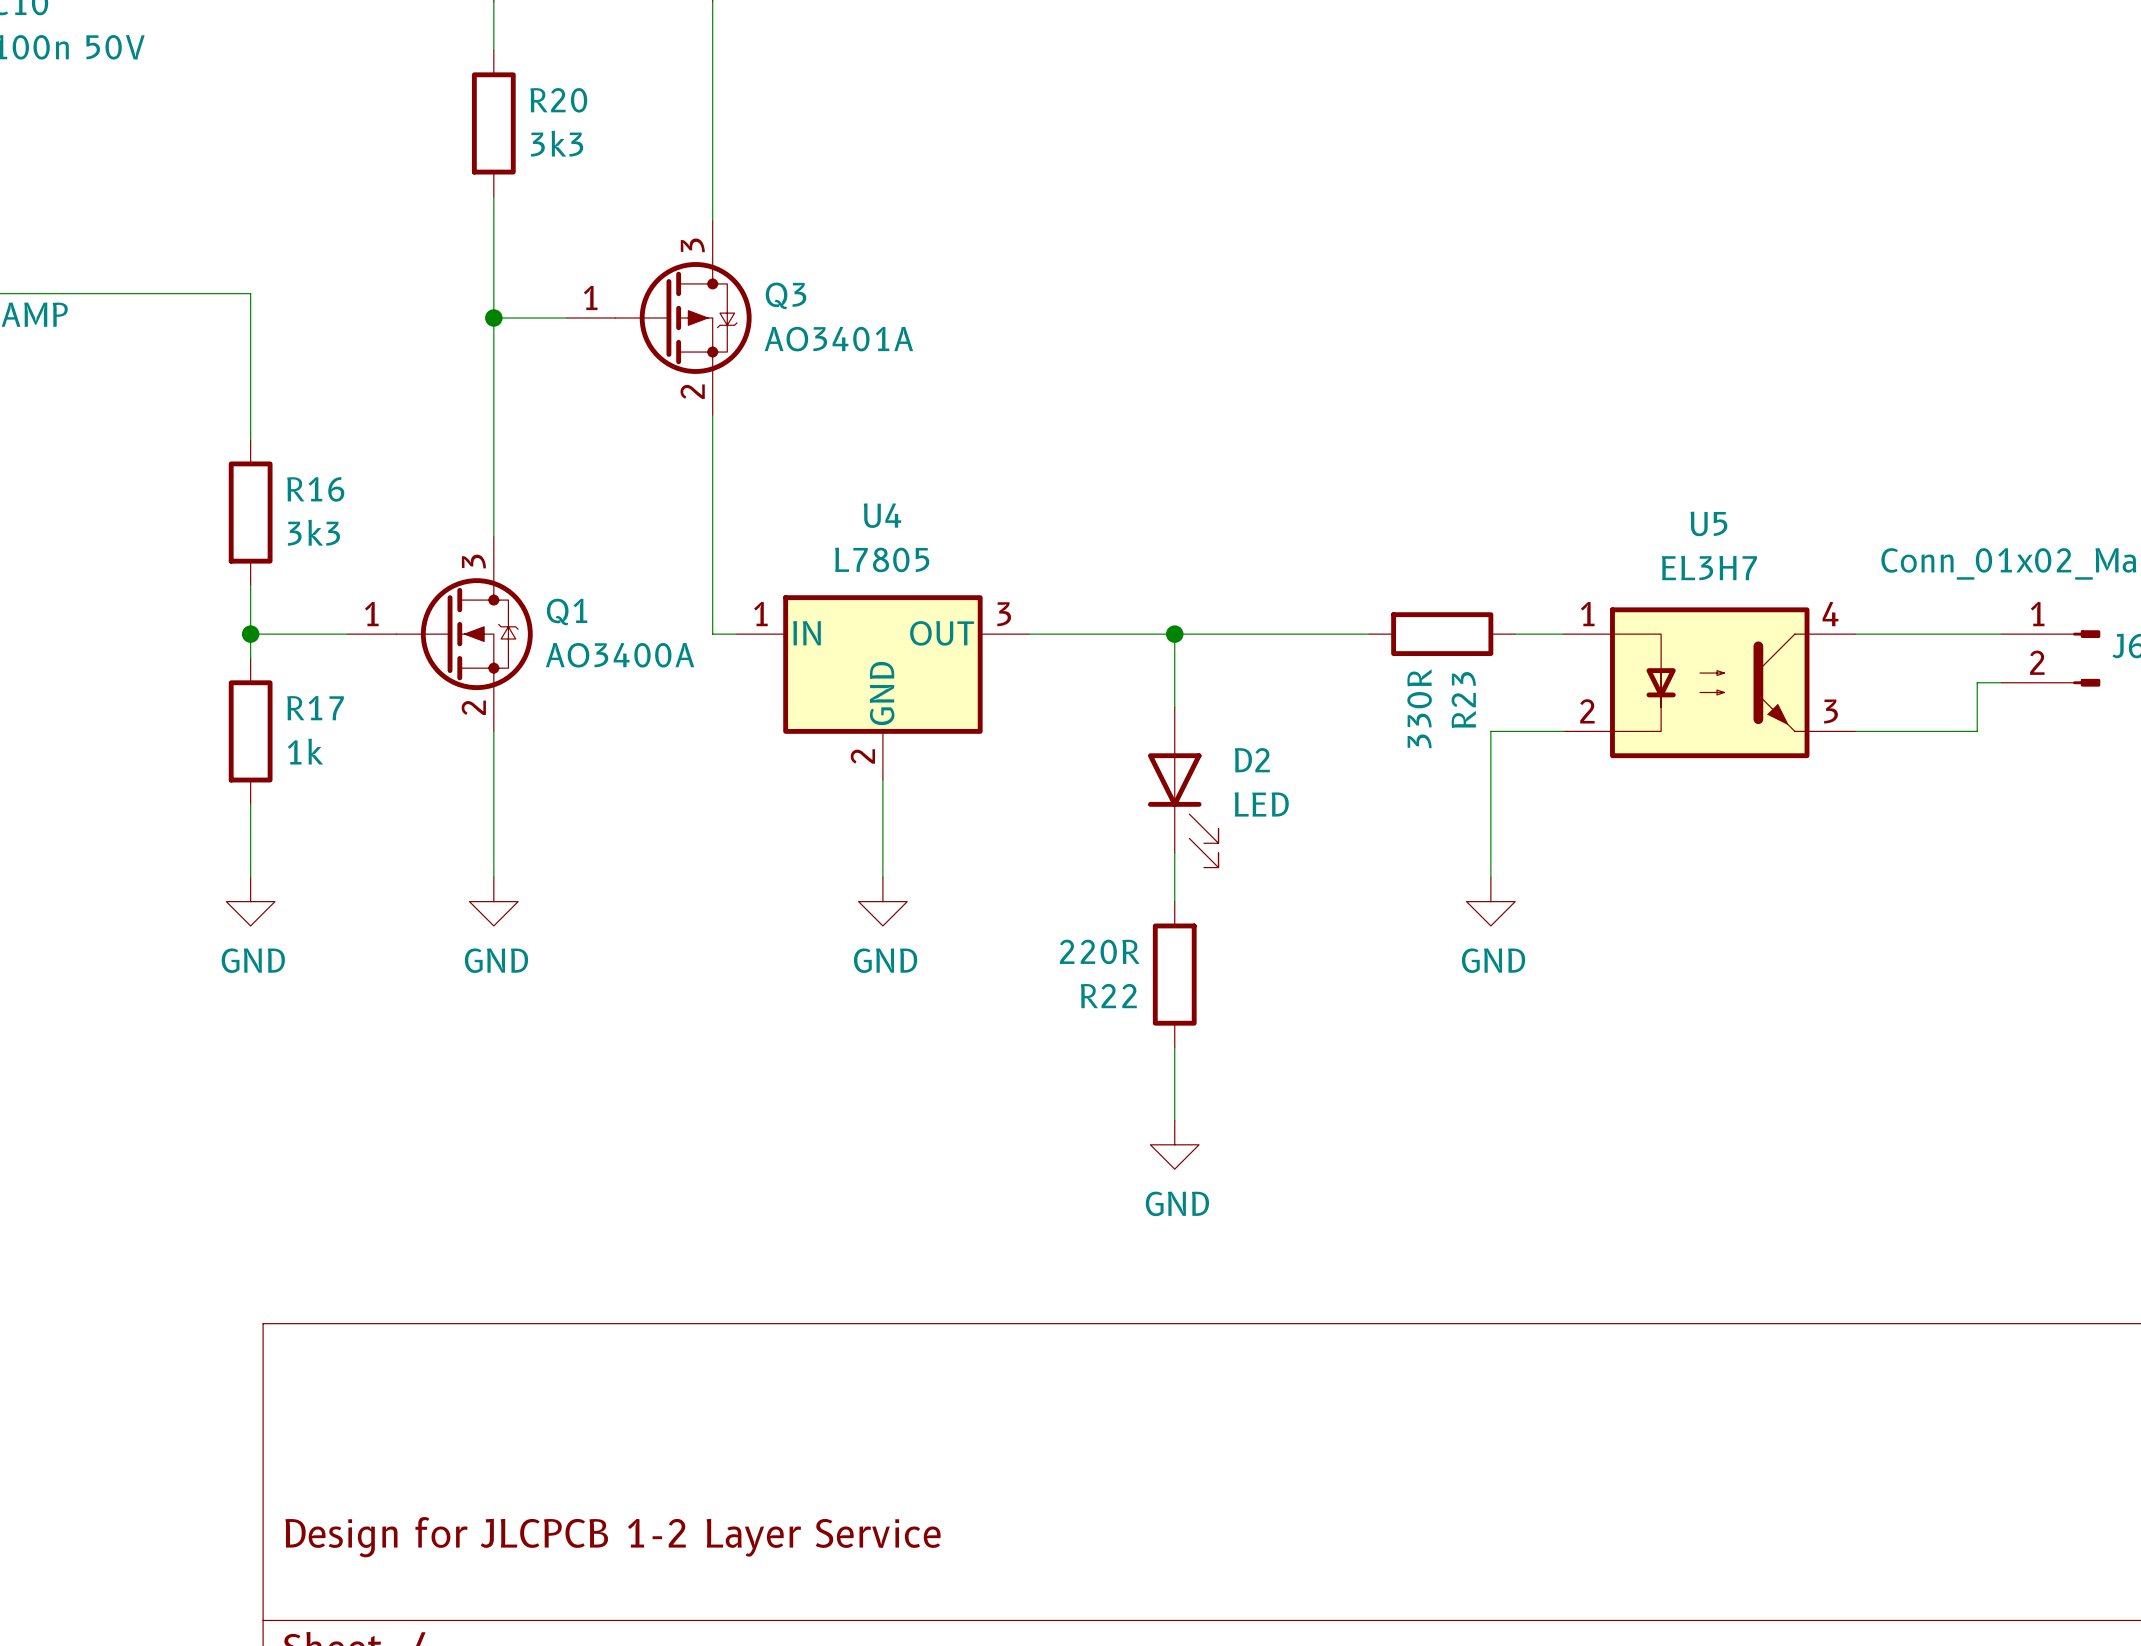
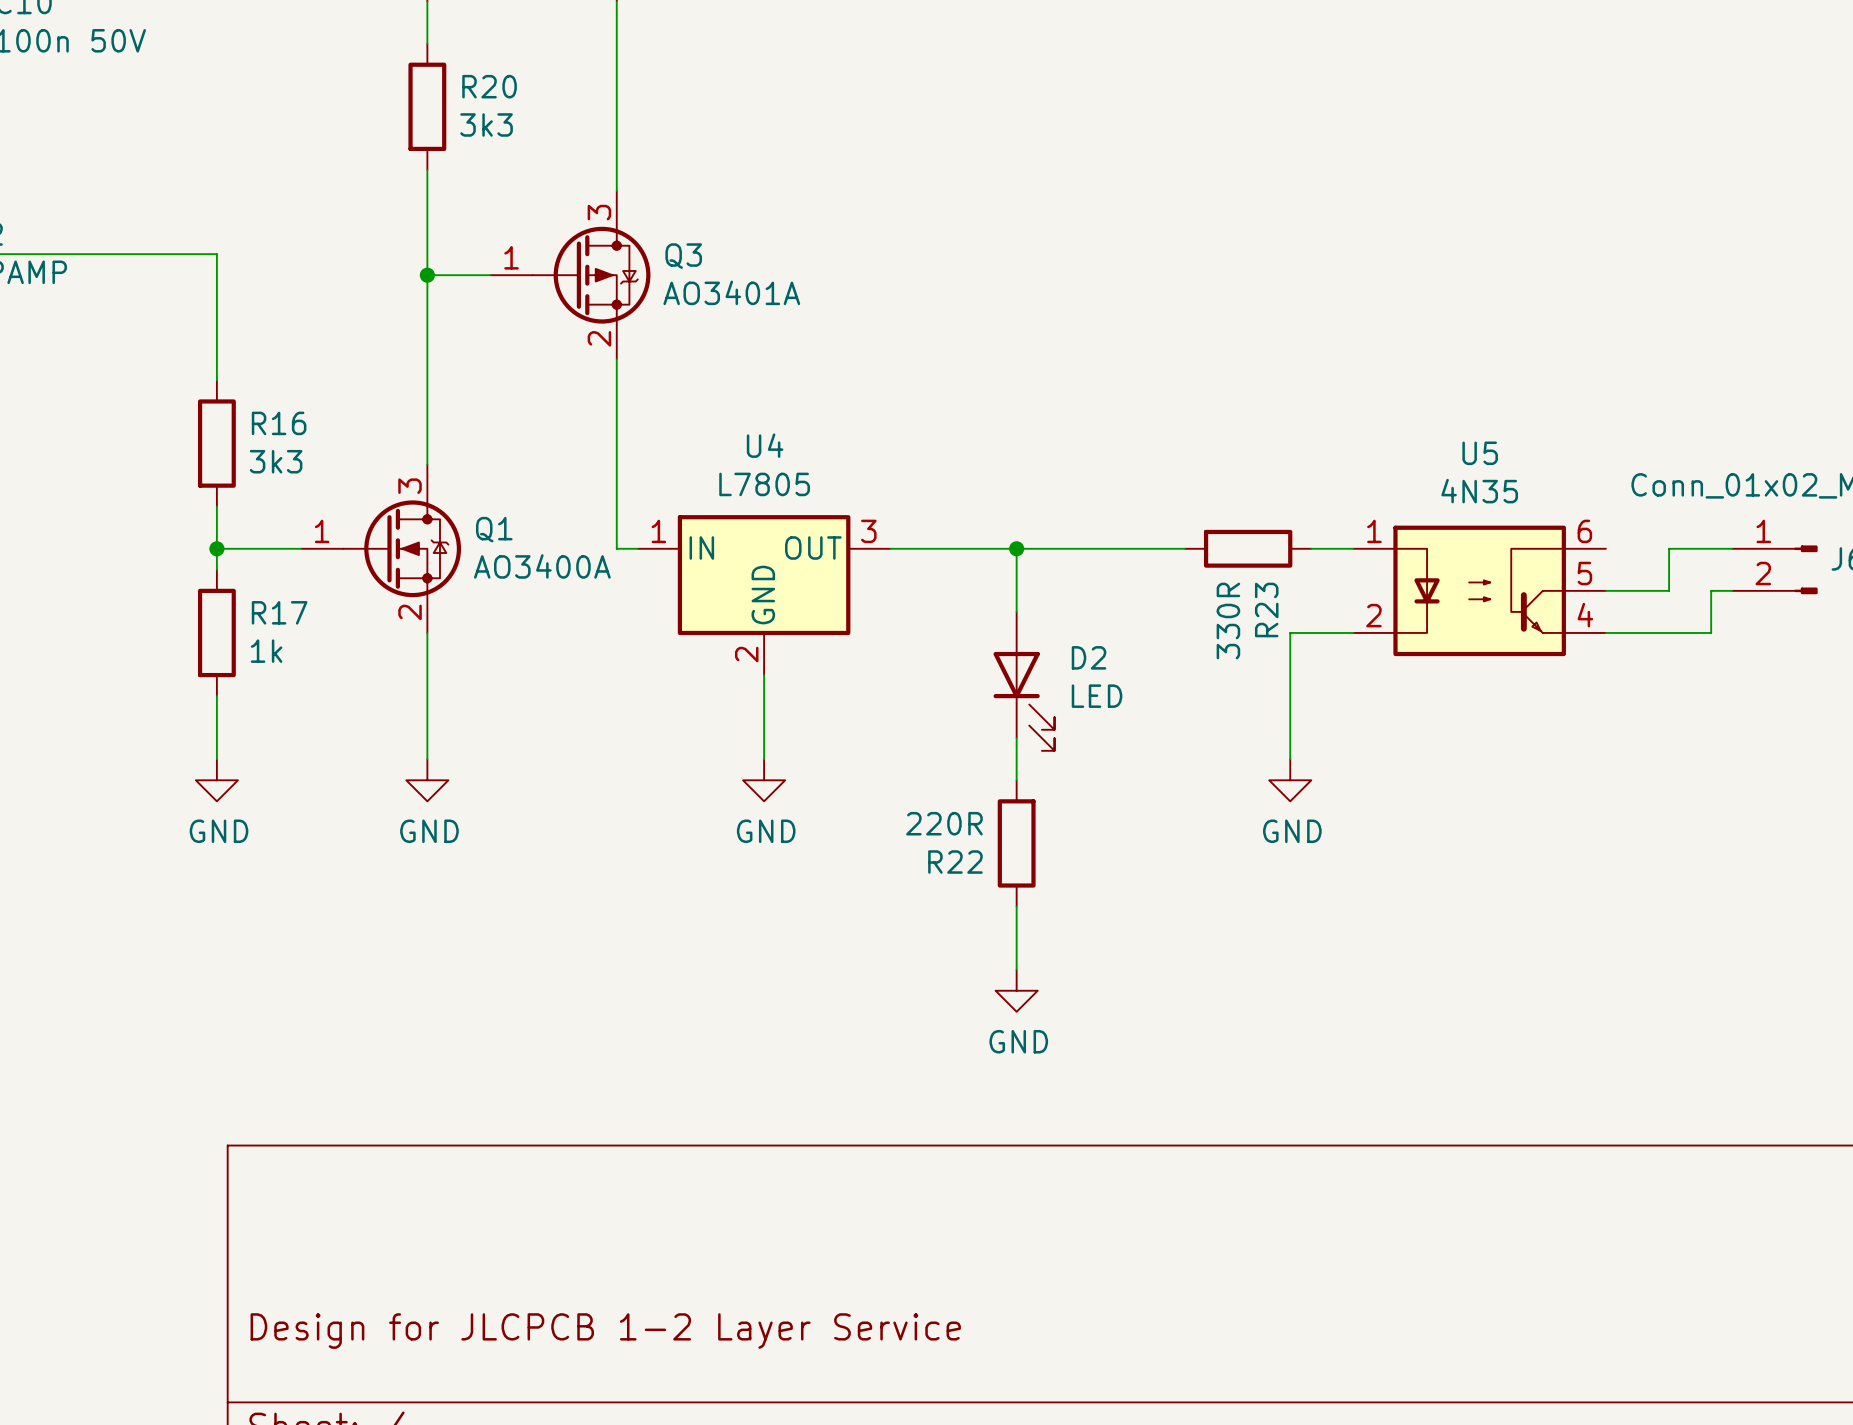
U5 value: EL3H7 (1709, 568) -> 4N35 (1479, 491)
U5 symbol: [1563, 607, 1856, 759] -> [1353, 525, 1606, 657]
wire: (1855, 634) (1928, 634) -> (1605, 590) (1669, 590) (1669, 548)

